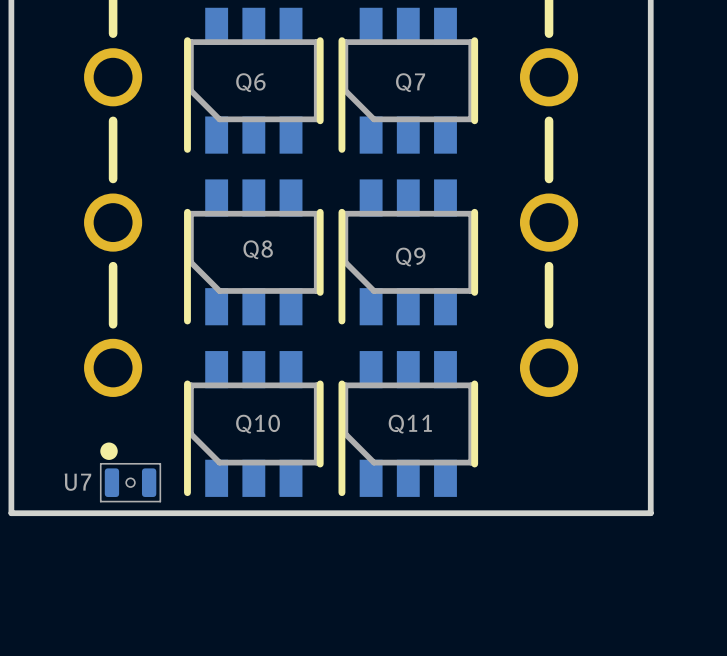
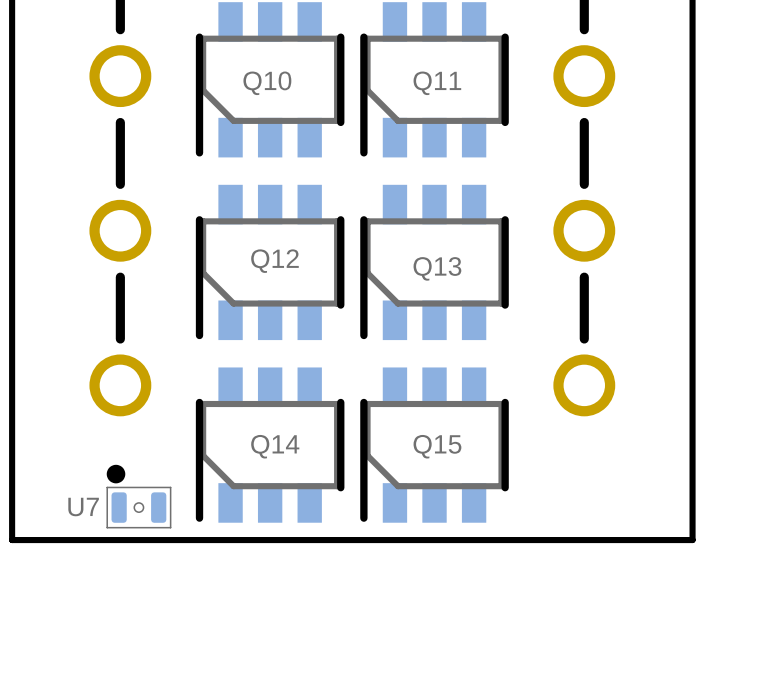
Q6 name: Q6 (250, 82) -> Q10 (267, 83)
Q7 name: Q7 (410, 82) -> Q11 (437, 83)
Q8 name: Q8 (258, 249) -> Q12 (274, 261)
Q9 name: Q9 (410, 257) -> Q13 (437, 268)
Q10 name: Q10 (258, 424) -> Q14 (275, 446)
Q11 name: Q11 (410, 424) -> Q15 (437, 446)

